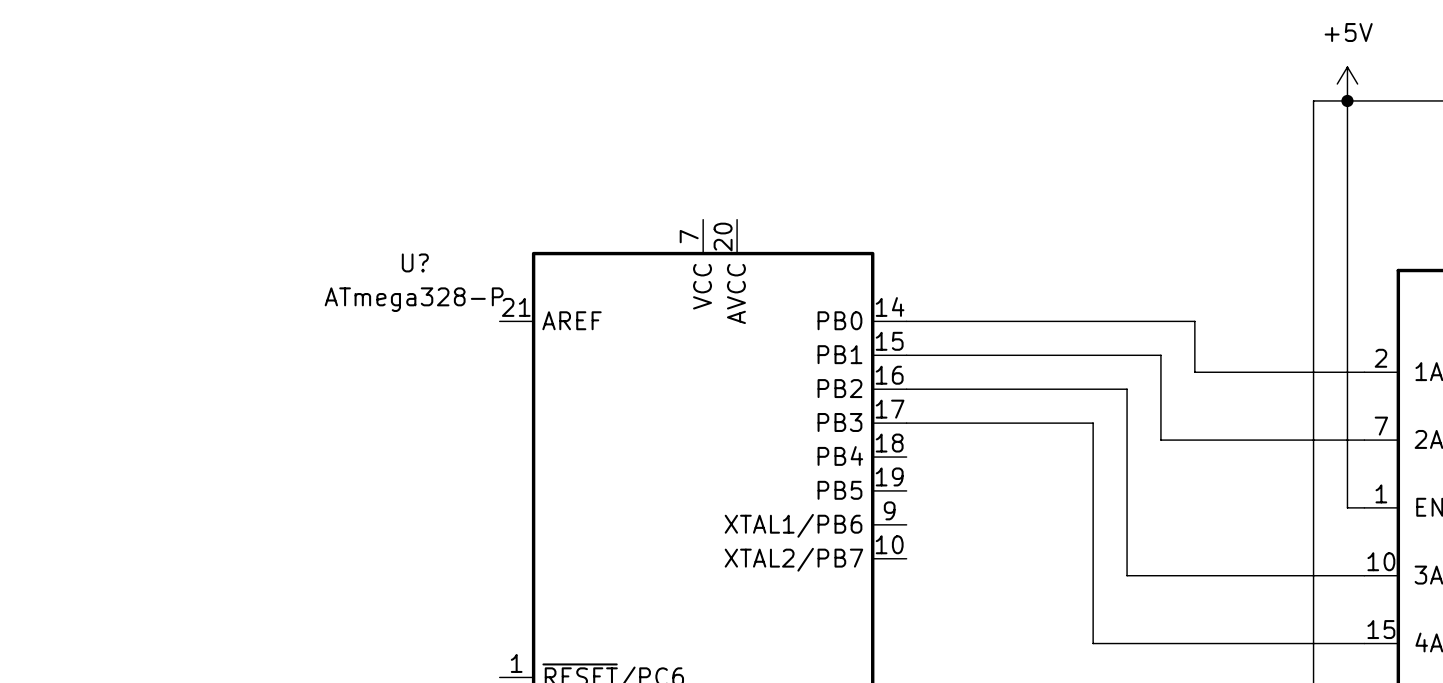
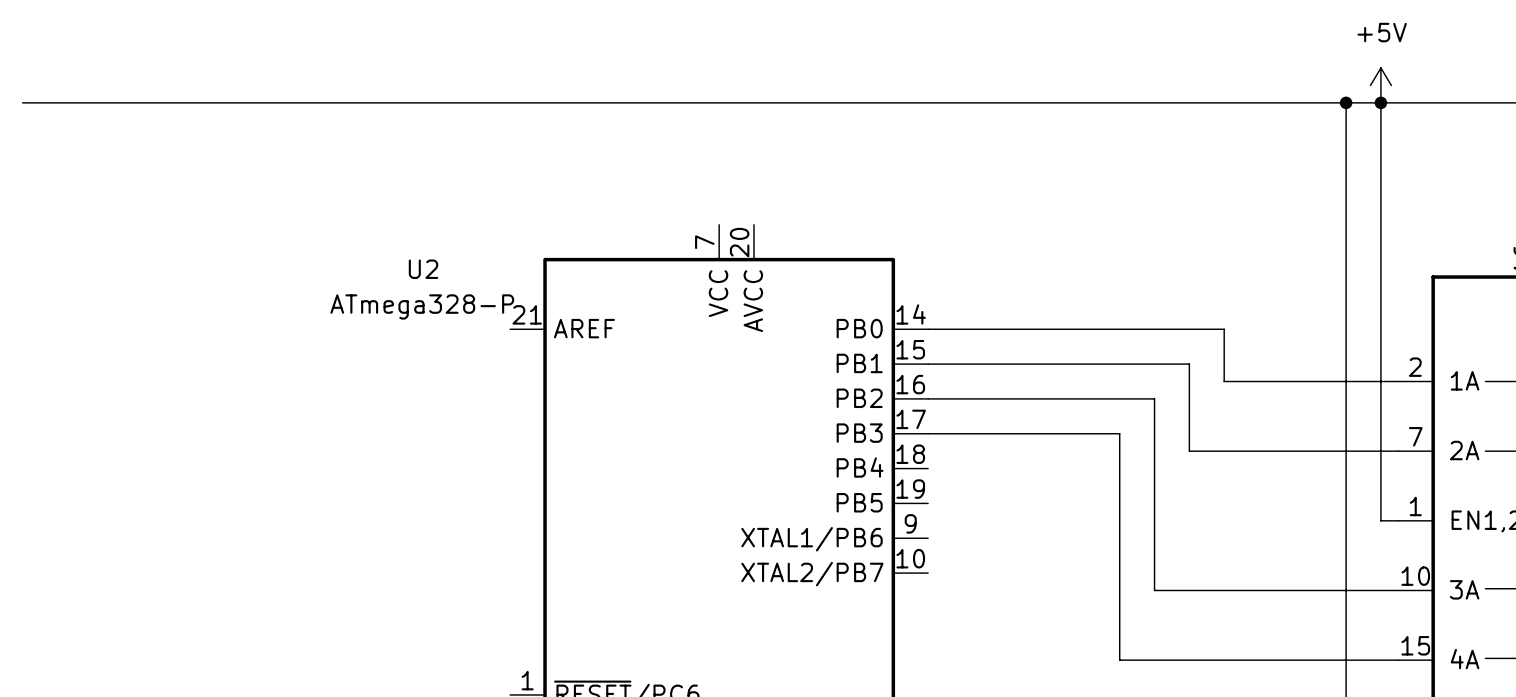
wire: none -> (22, 102) (1346, 102)
junction: none -> (1346, 102)
U? name: U? (415, 262) -> U2 (423, 269)

